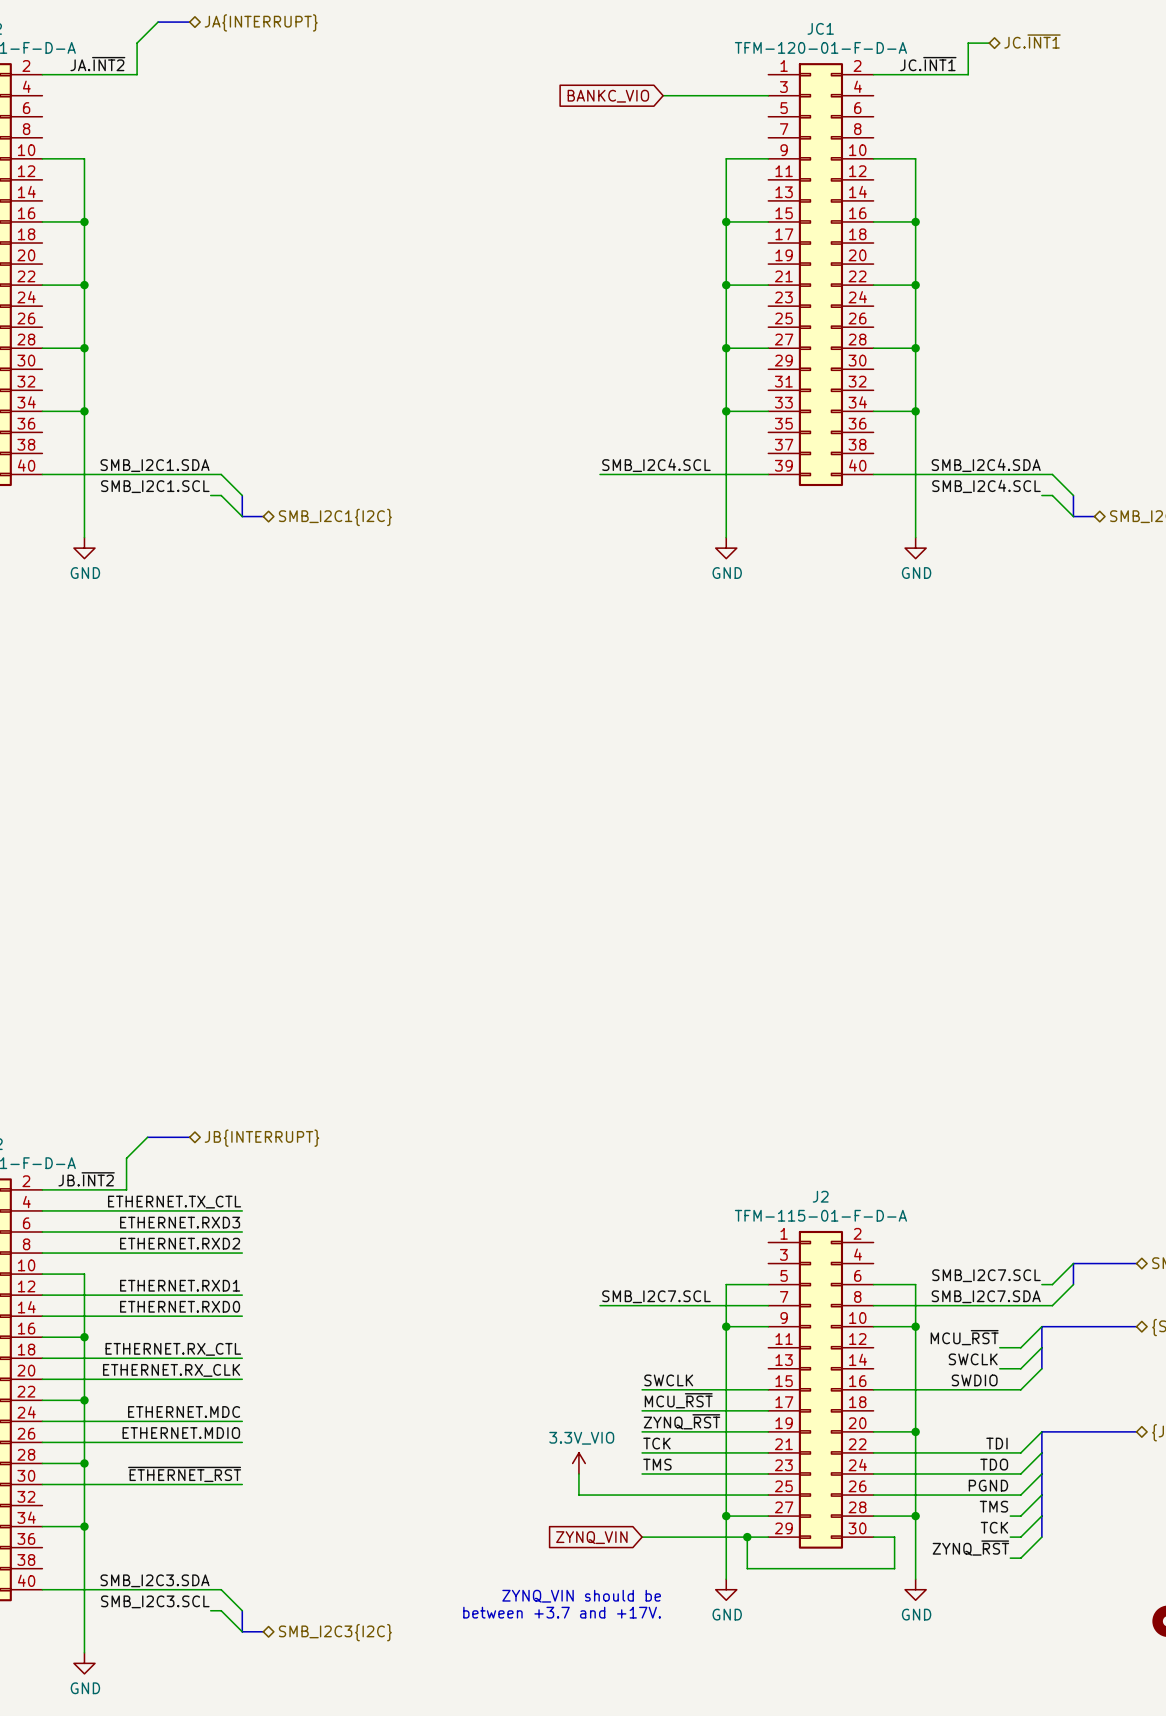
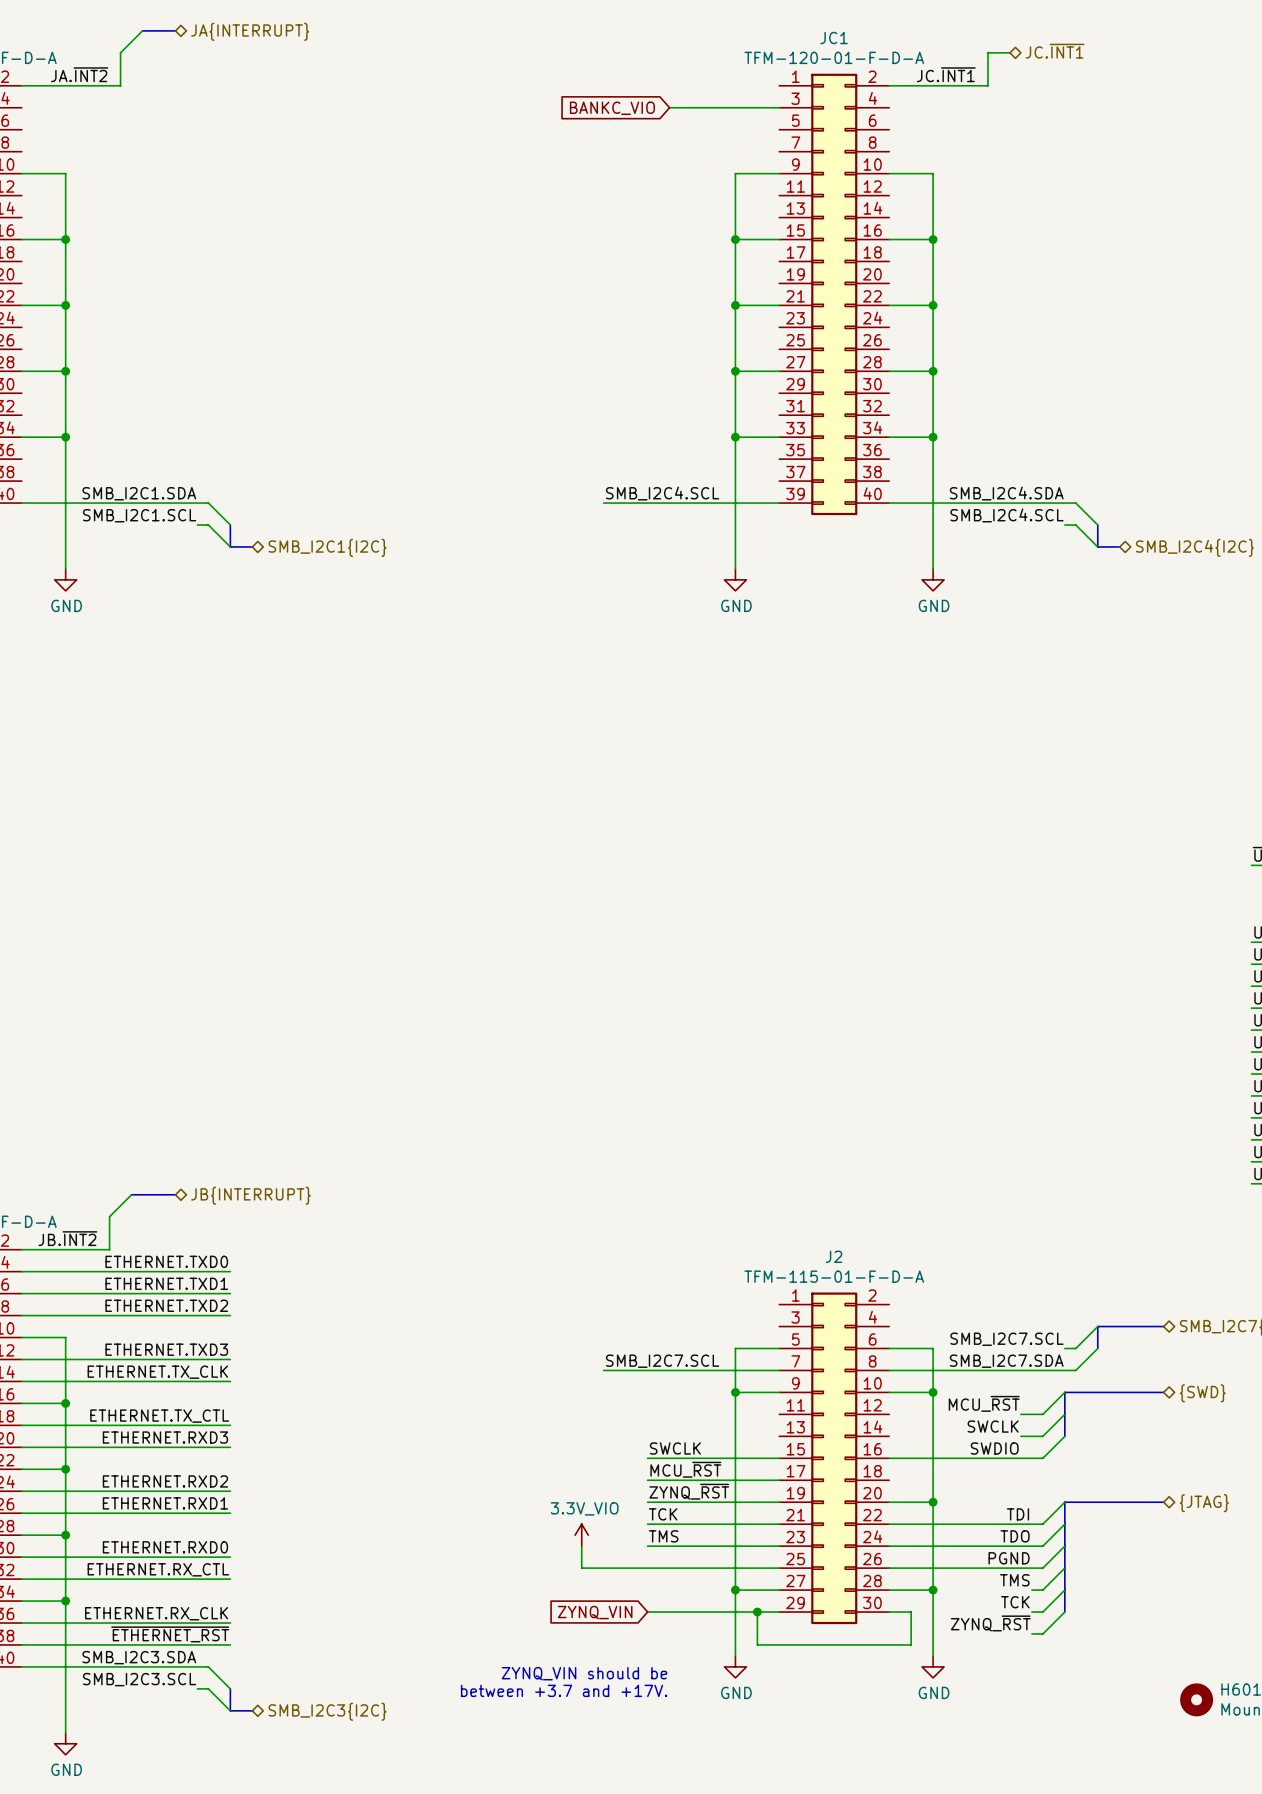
label: ETHERNET.TX_CTL (174, 1202) -> ETHERNET.TXD0 (166, 1261)
label: ETHERNET.RXD3 (180, 1222) -> ETHERNET.TXD1 (166, 1283)
label: ETHERNET.RXD2 (180, 1243) -> ETHERNET.TXD2 (166, 1305)
label: ETHERNET.RXD1 (180, 1285) -> ETHERNET.TXD3 (166, 1349)
label: ETHERNET.RXD0 (180, 1306) -> ETHERNET.TX_CLK (157, 1372)
label: ETHERNET.RX_CTL (173, 1349) -> ETHERNET.TX_CTL (159, 1416)
label: ETHERNET.RX_CLK (171, 1370) -> ETHERNET.RXD3 (165, 1437)
label: ETHERNET.MDC (184, 1411) -> ETHERNET.RXD2 (165, 1481)
label: ETHERNET.MDIO (181, 1433) -> ETHERNET.RXD1 (165, 1503)
label: ~{ETHERNET_RST} (184, 1474) -> ETHERNET.RXD0 (165, 1547)
label: none -> ETHERNET.RX_CTL (158, 1569)
wire: none -> (21, 1579) (230, 1579)
label: none -> ETHERNET.RX_CLK (156, 1613)
wire: none -> (21, 1623) (230, 1623)
label: none -> ~{ETHERNET_RST} (170, 1634)
wire: none -> (21, 1644) (230, 1644)

